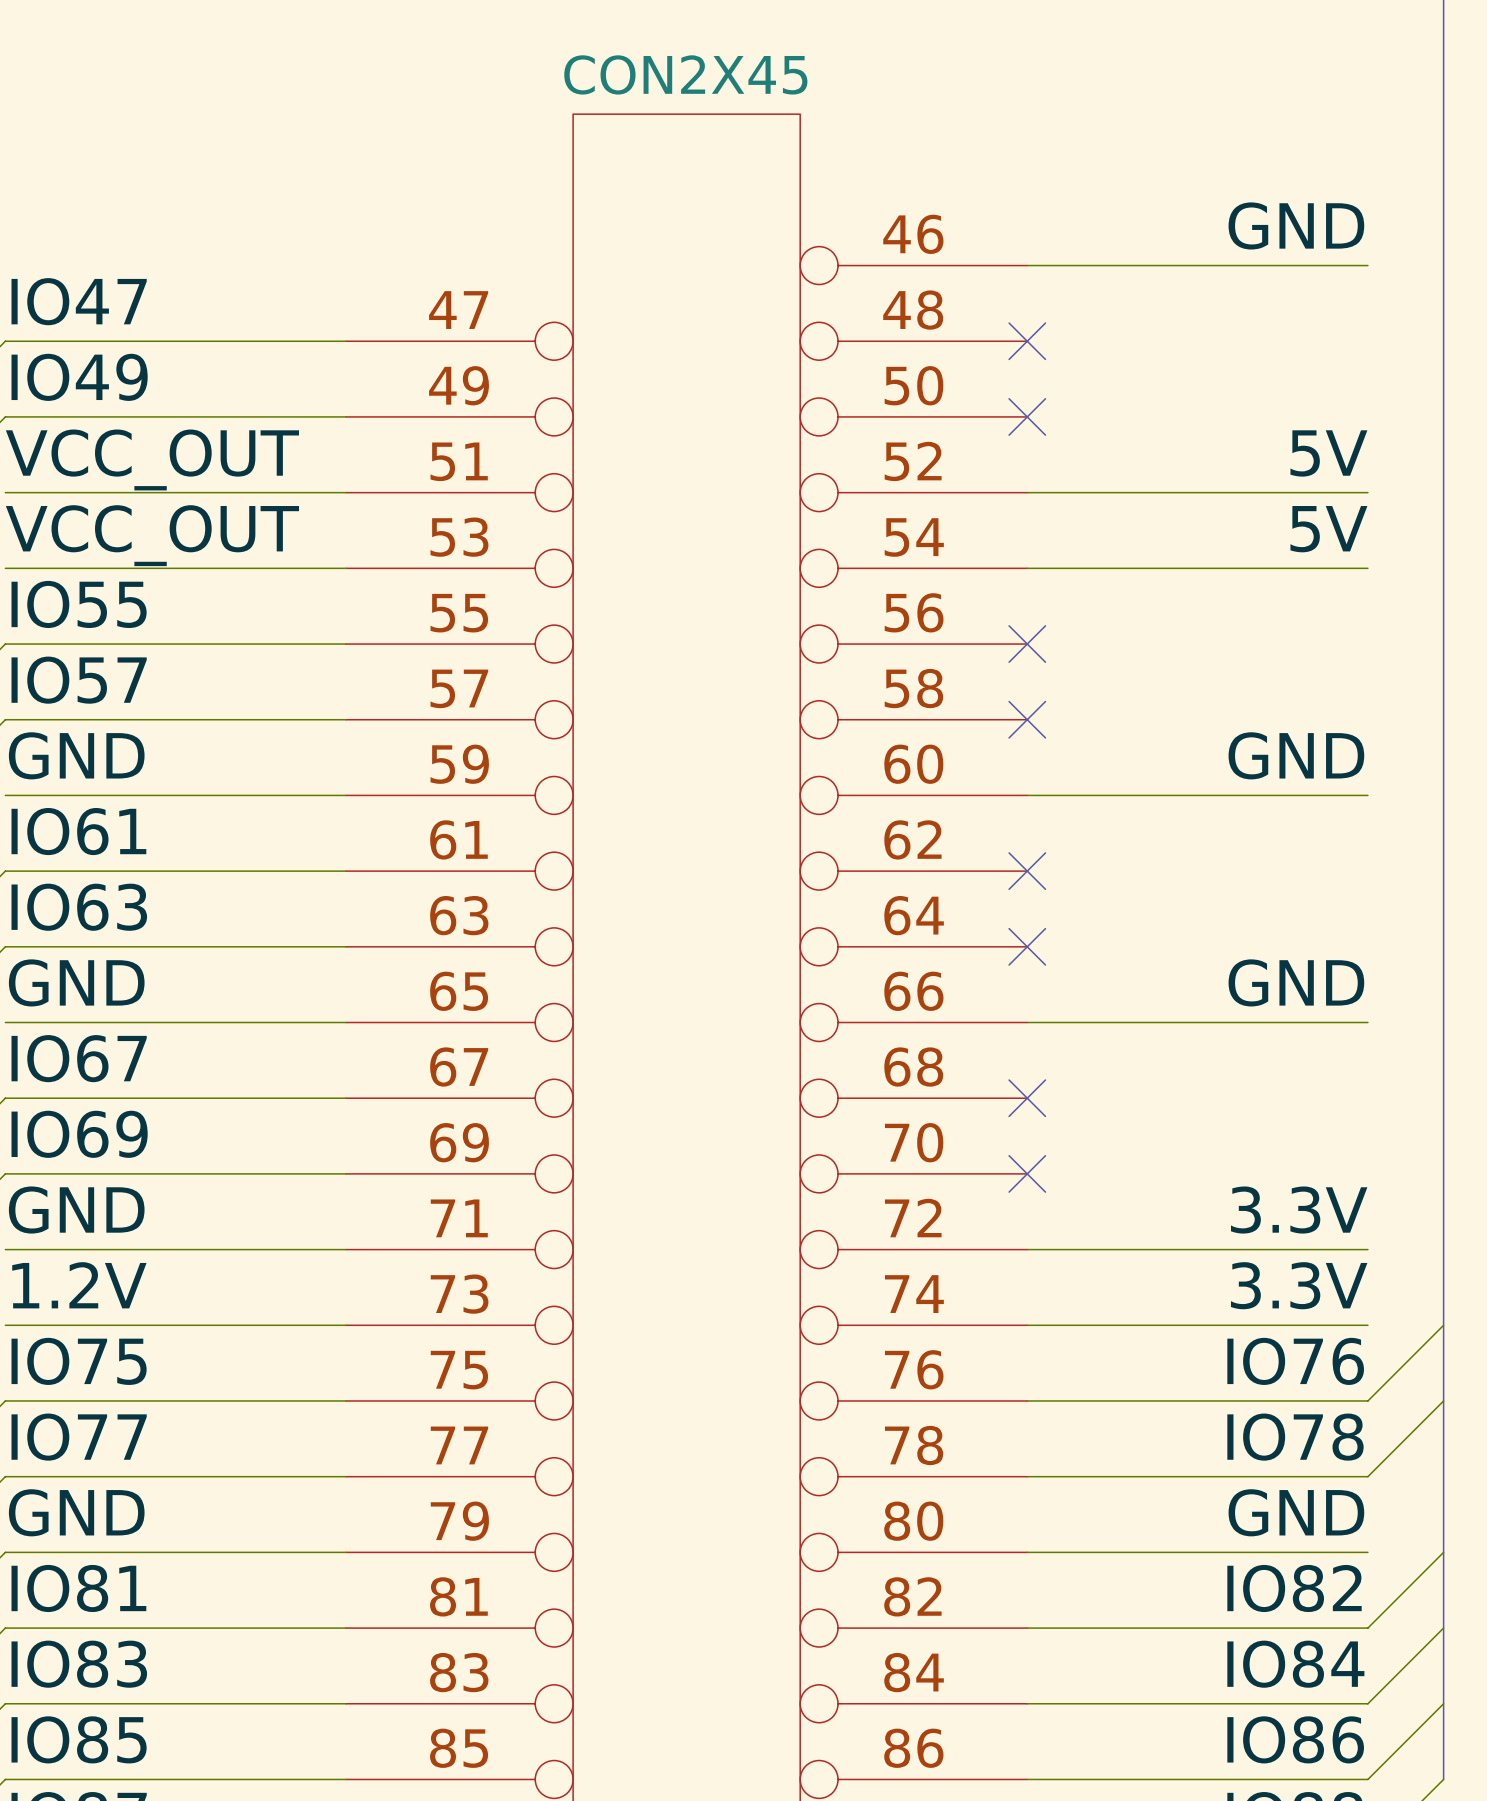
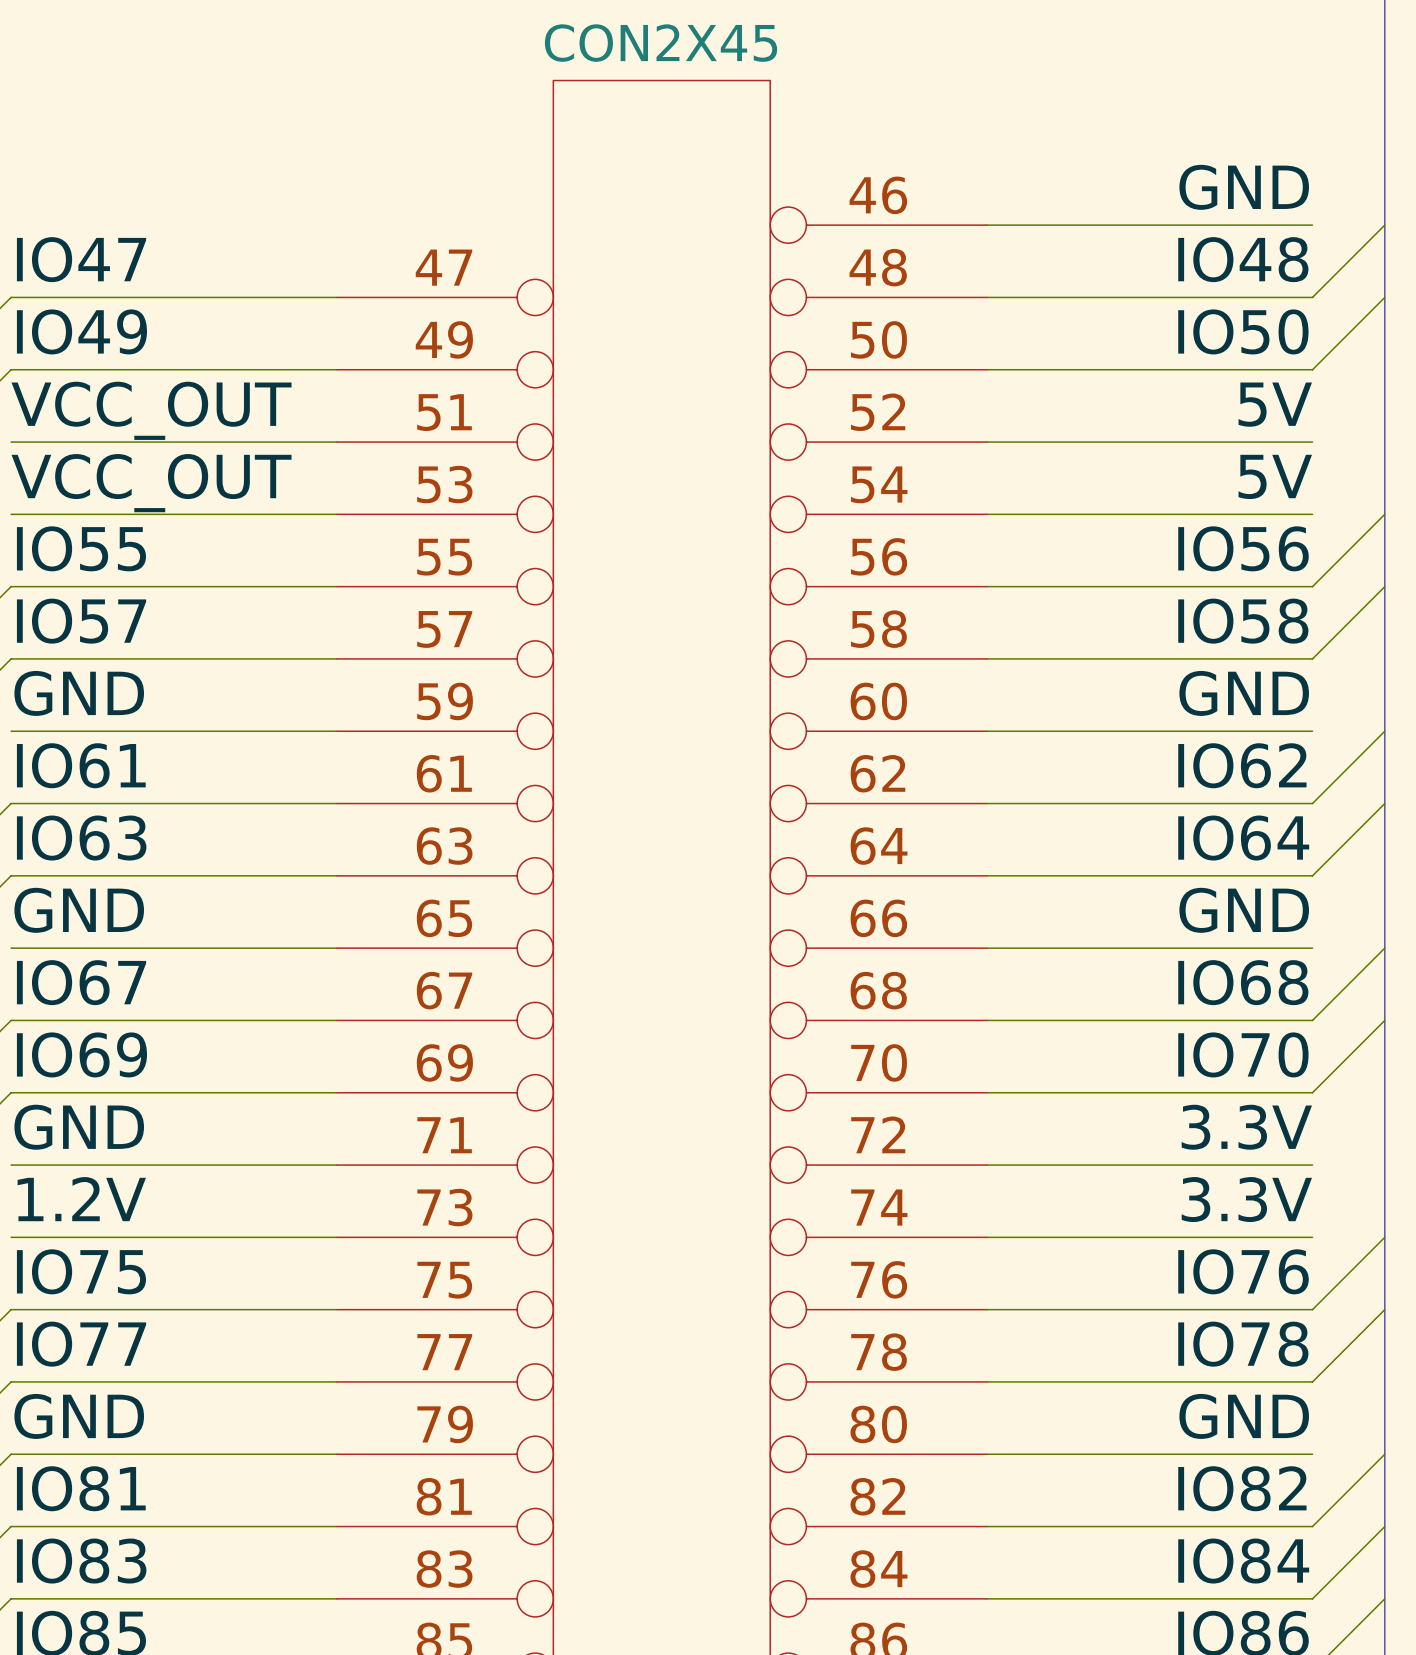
wire: none -> (1384, 225) (1312, 297) (987, 297)
label: none -> IO48 (1243, 259)
no-connect mark: (1027, 341) -> none
wire: none -> (1384, 297) (1312, 369) (987, 369)
label: none -> IO50 (1243, 331)
no-connect mark: (1027, 416) -> none
wire: none -> (1384, 514) (1312, 586) (987, 586)
label: none -> IO56 (1243, 548)
no-connect mark: (1027, 644) -> none
wire: none -> (1384, 586) (1312, 658) (987, 658)
label: none -> IO58 (1243, 621)
no-connect mark: (1027, 719) -> none
wire: none -> (1384, 731) (1312, 803) (987, 803)
label: none -> IO62 (1242, 765)
no-connect mark: (1027, 871) -> none
wire: none -> (1384, 803) (1312, 875) (987, 875)
label: none -> IO64 (1243, 838)
no-connect mark: (1027, 946) -> none
wire: none -> (1384, 948) (1312, 1020) (987, 1020)
label: none -> IO68 (1243, 982)
no-connect mark: (1027, 1098) -> none
wire: none -> (1384, 1020) (1312, 1092) (987, 1092)
label: none -> IO70 (1243, 1054)
no-connect mark: (1027, 1173) -> none

